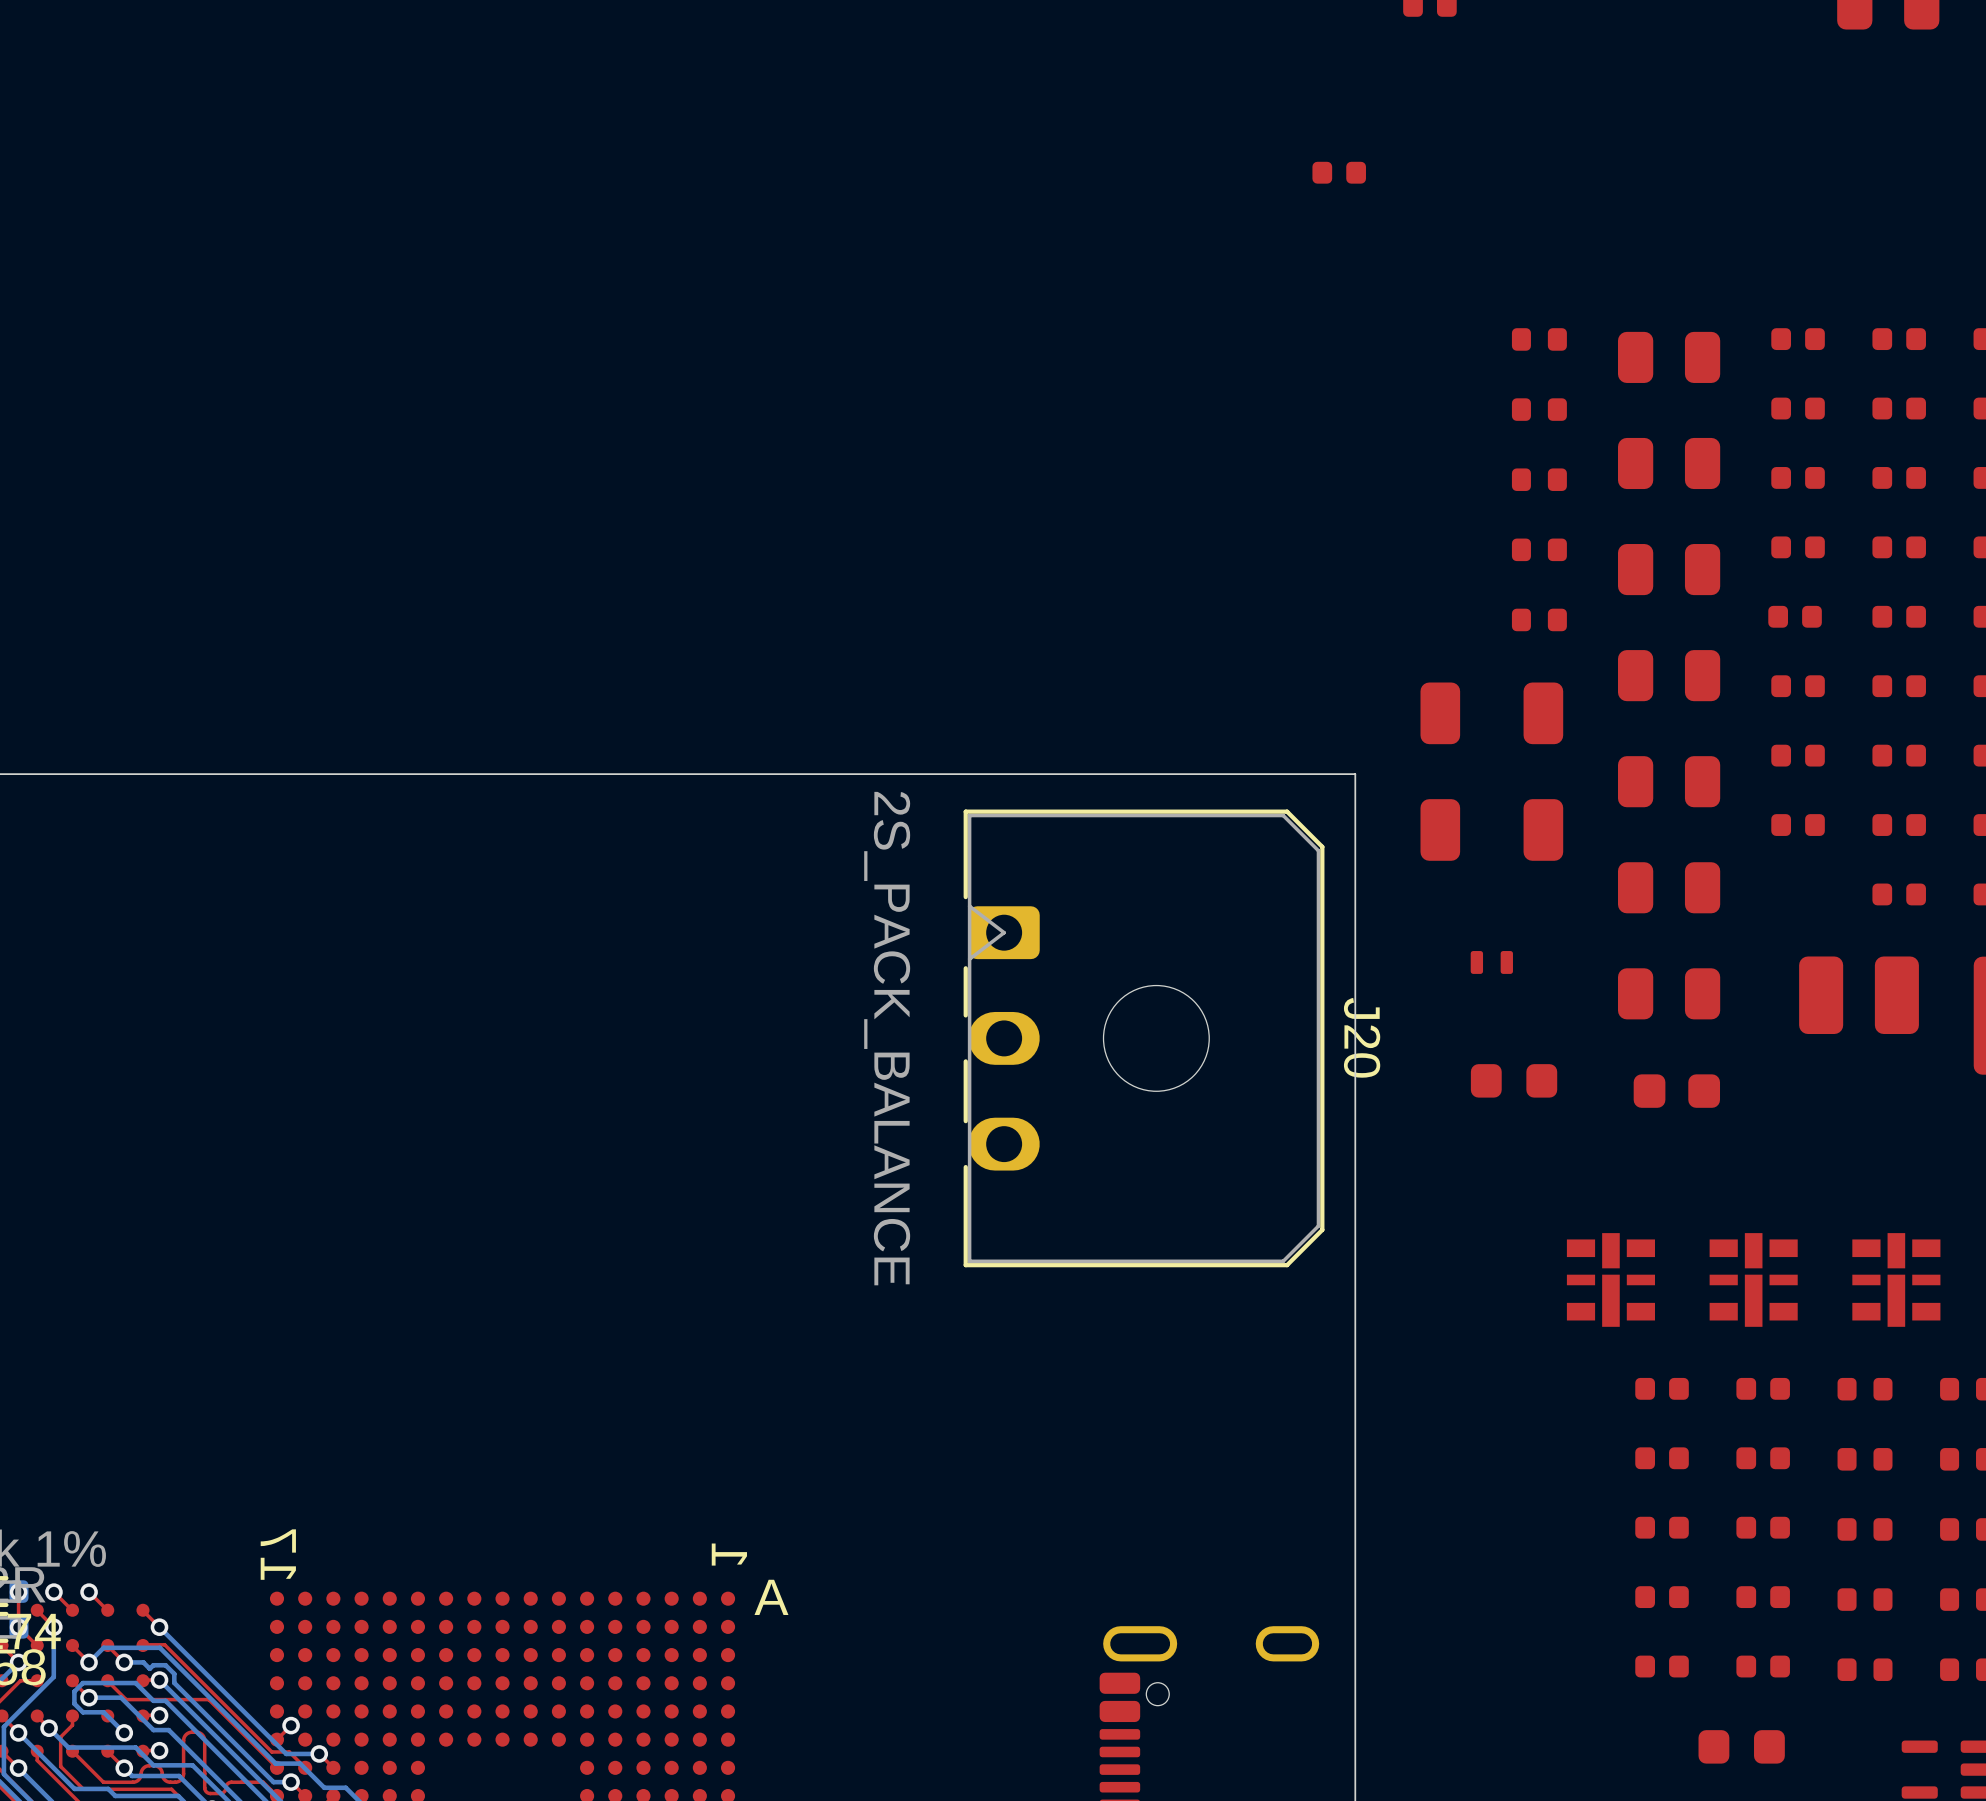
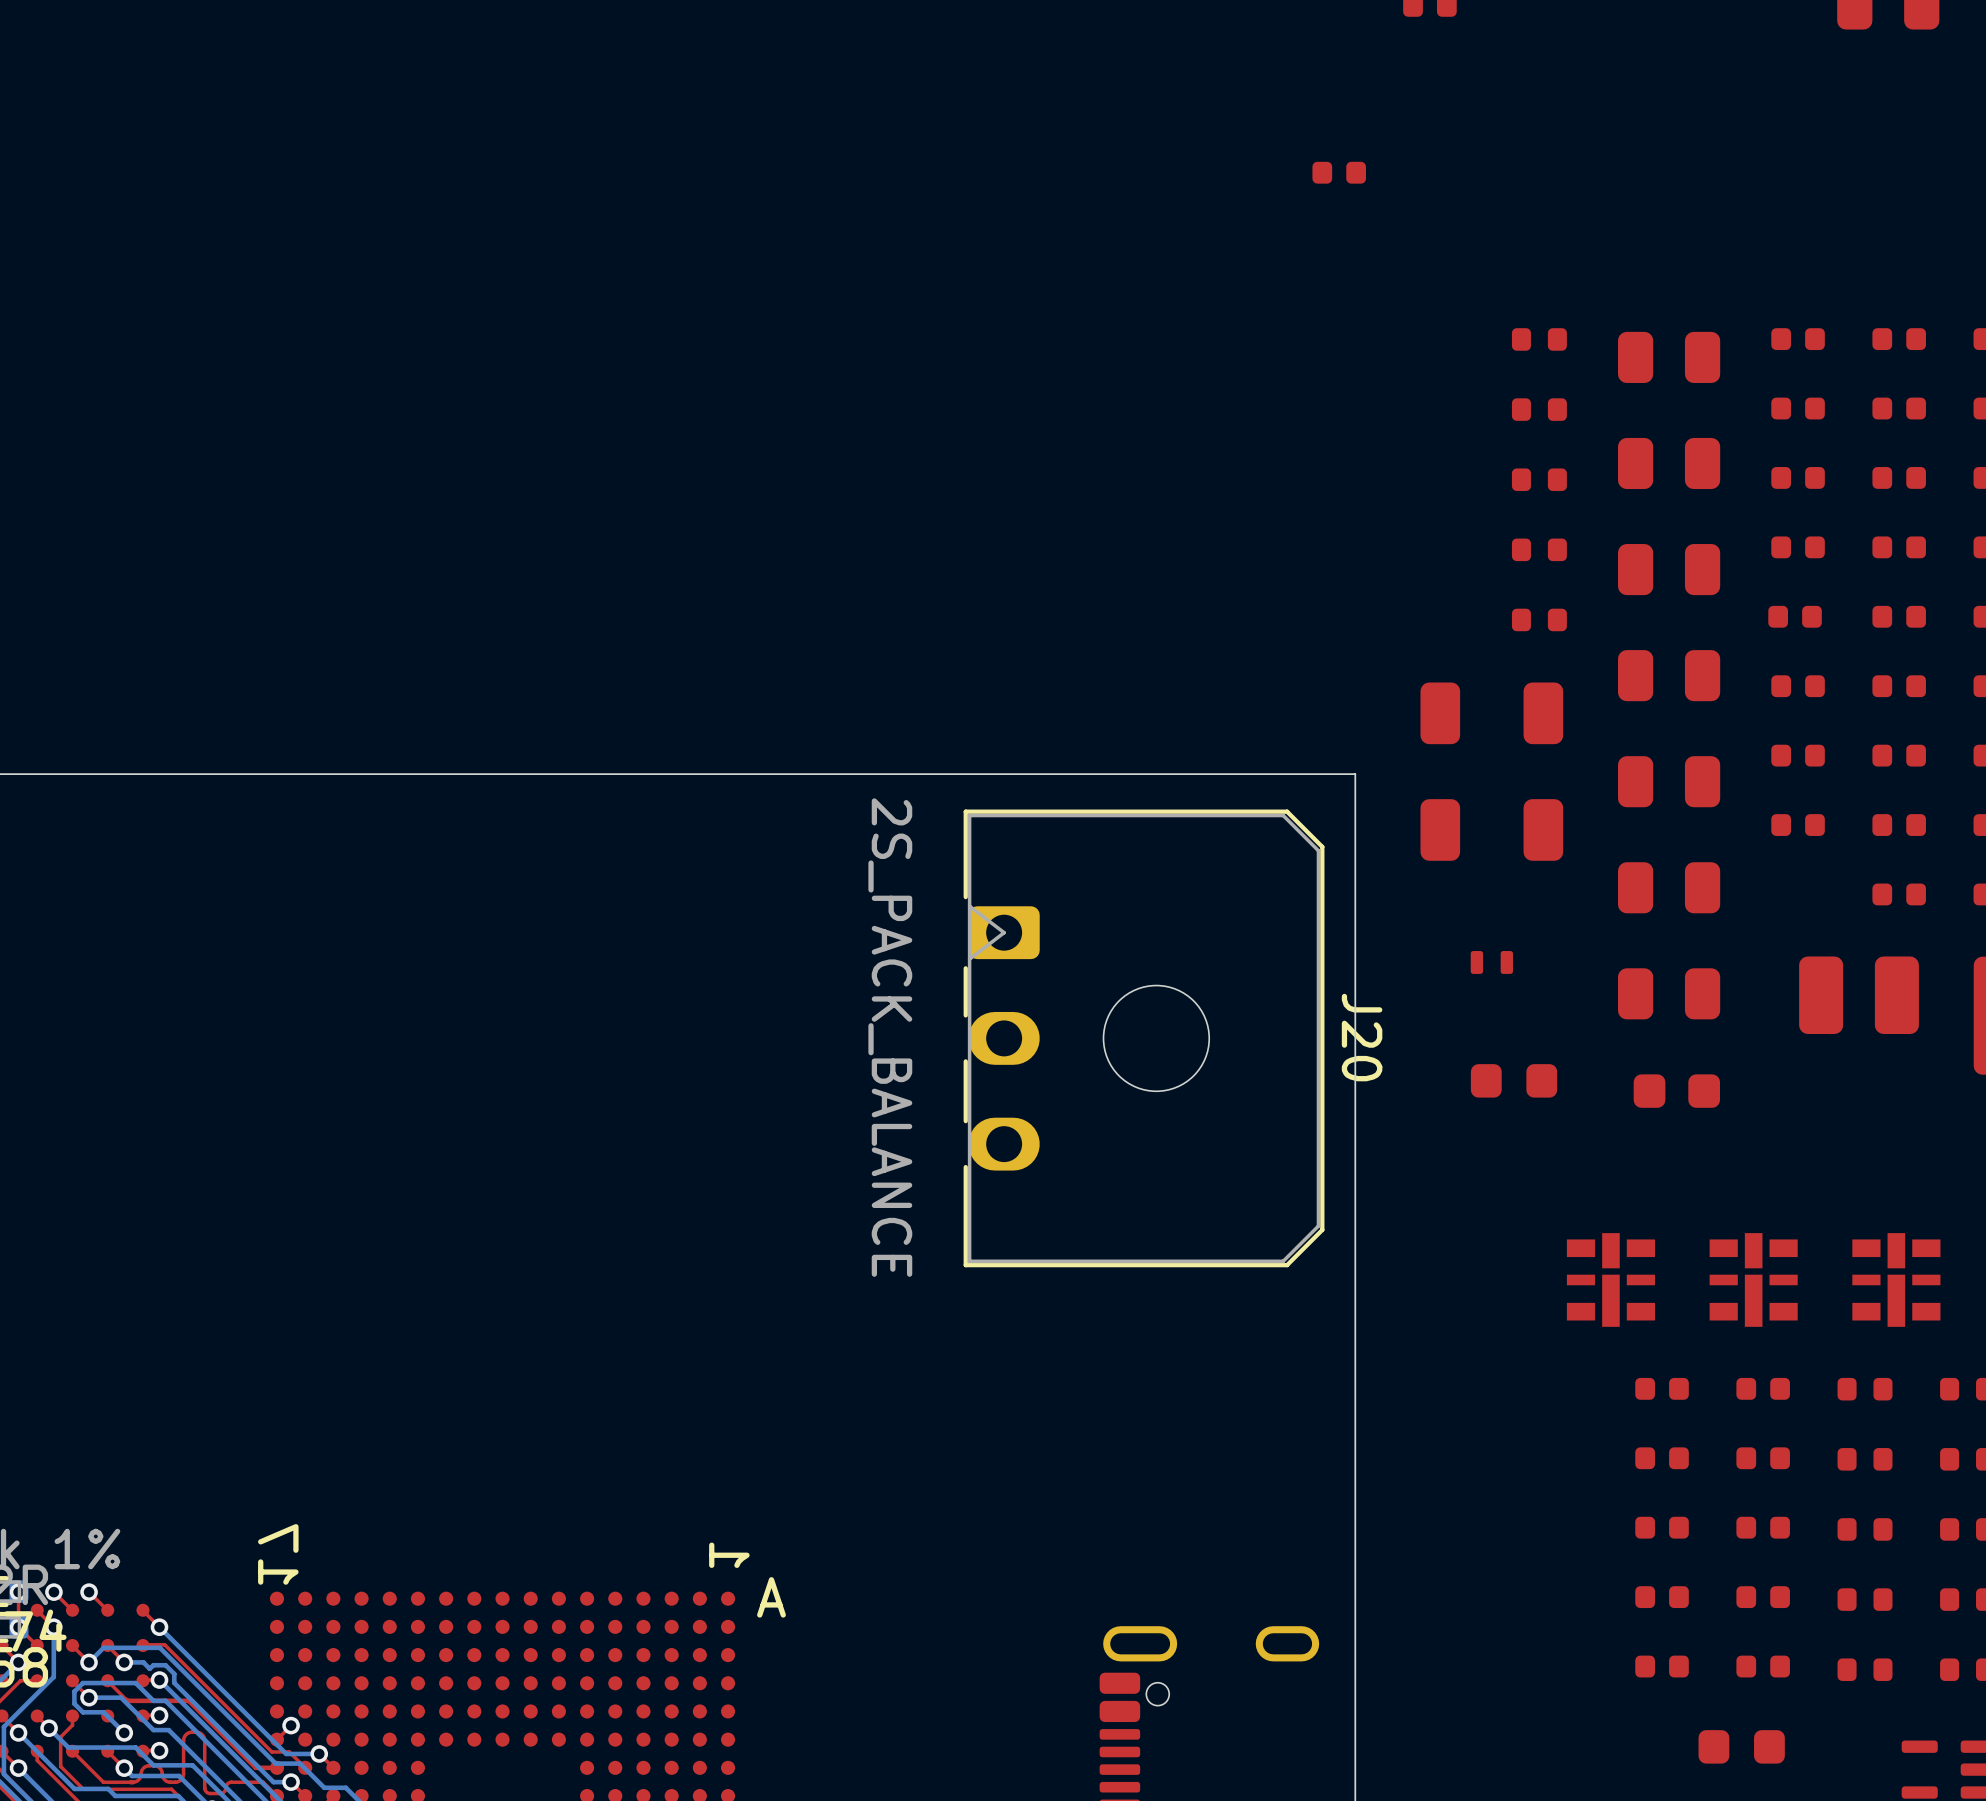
top track: (126, 1699) (208, 1699) (277, 1767) -> (126, 1699) (188, 1700) (255, 1767) (277, 1767)

